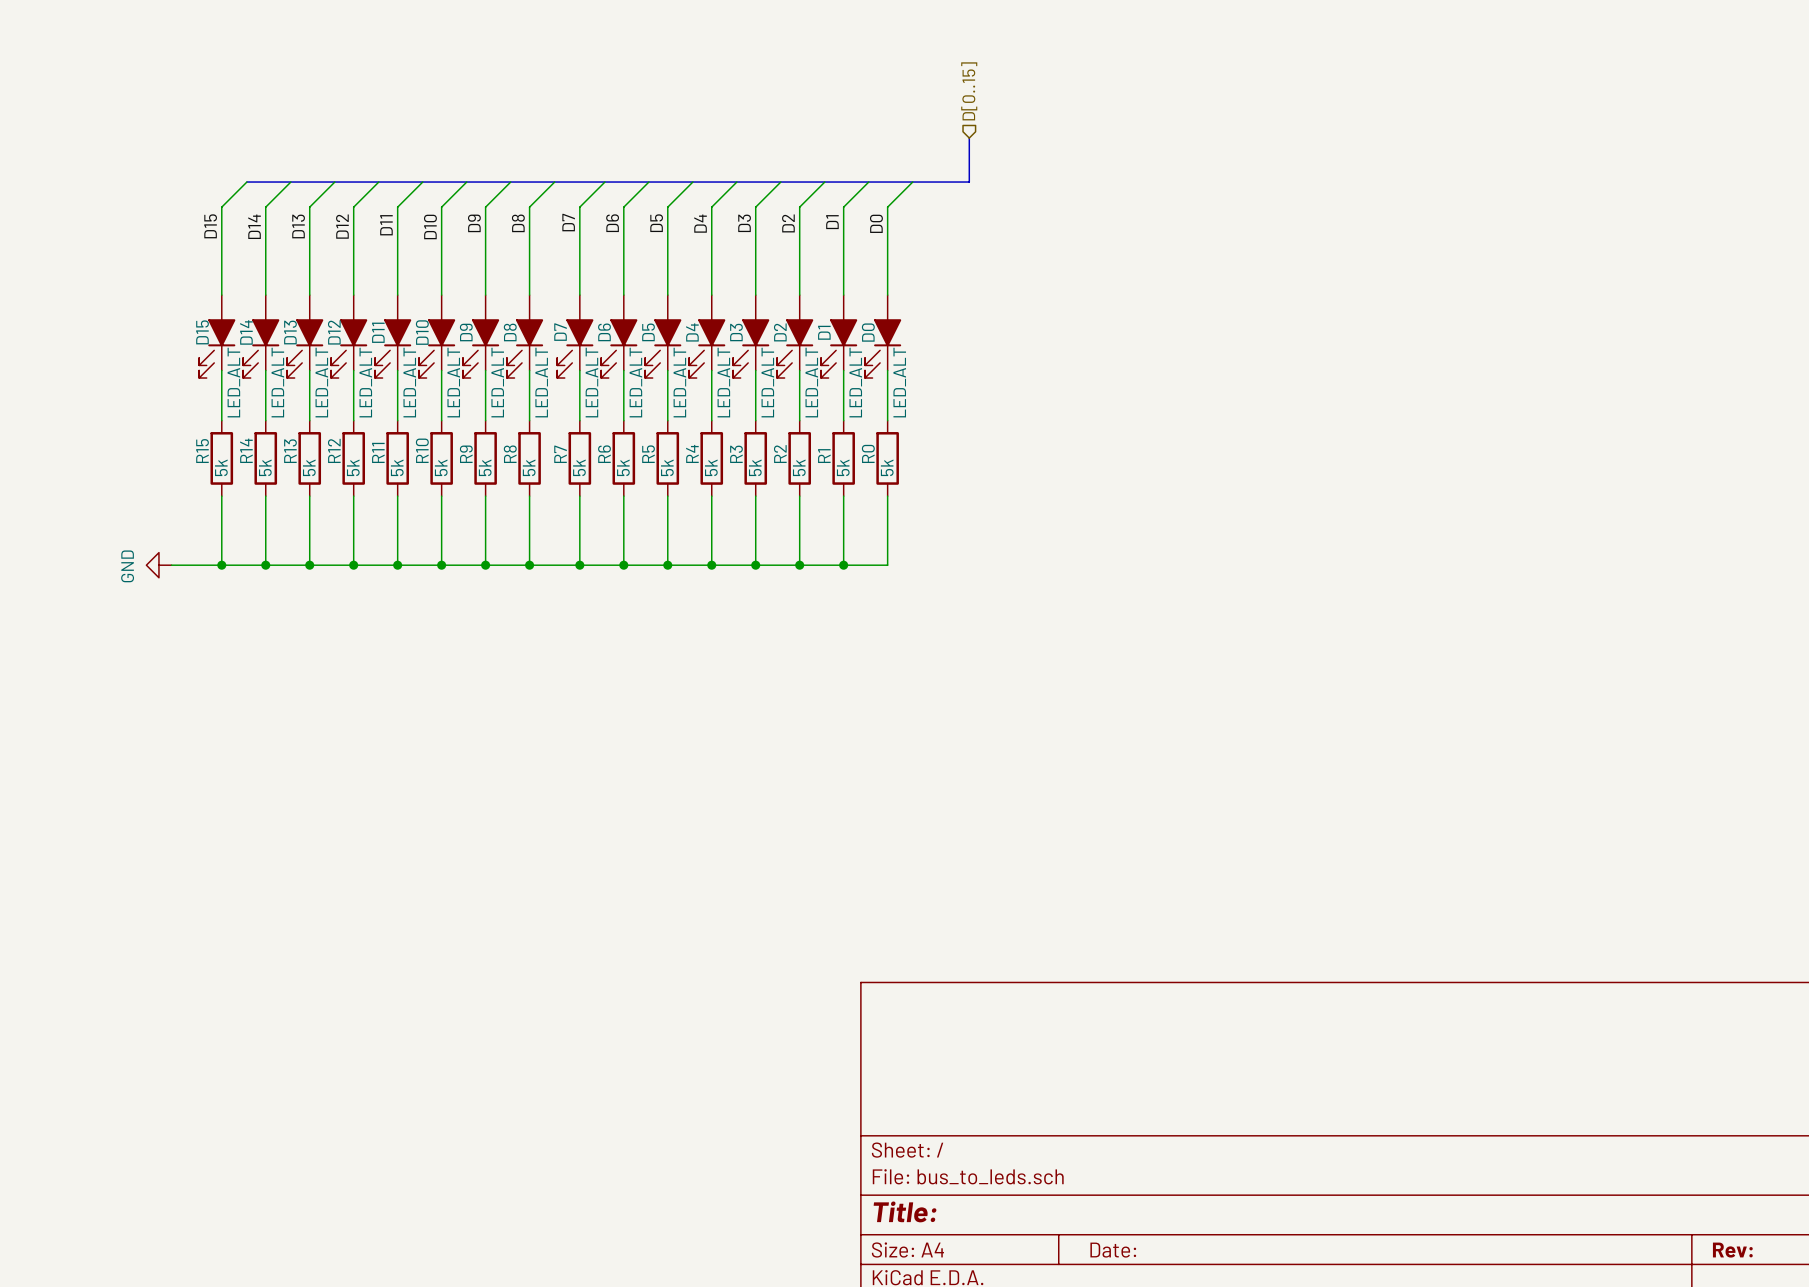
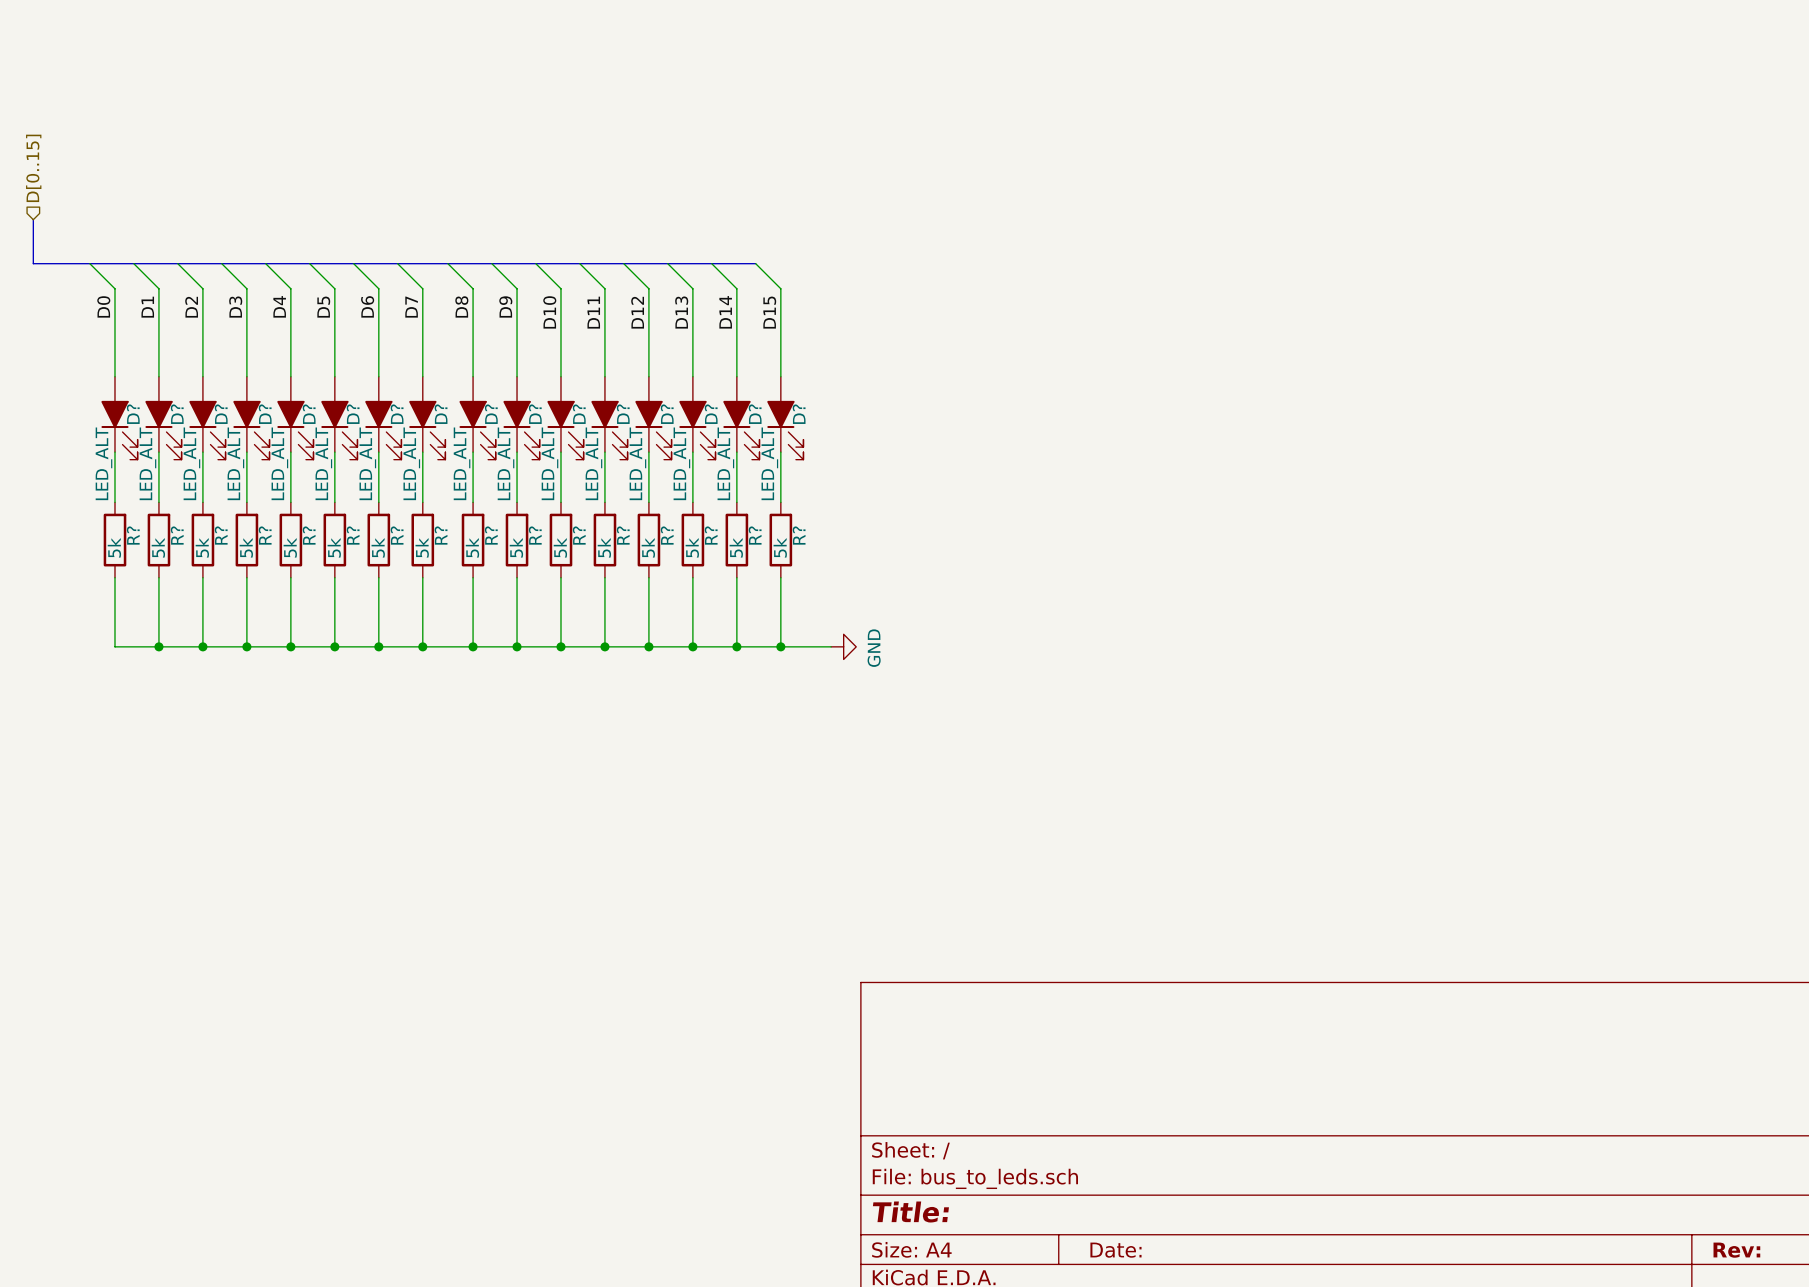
hierarchical label: D[0..15] (969, 91) -> none
bus: (969, 138) (969, 182) (246, 182) -> none
hierarchical label: none -> D[0..15] (33, 168)
wire: (246, 182) (221, 207) (221, 295) -> none
wire: (290, 182) (265, 207) (265, 295) -> none
wire: (334, 182) (309, 207) (309, 295) -> none
wire: (378, 182) (353, 207) (353, 295) -> none
wire: (422, 182) (397, 207) (397, 295) -> none
wire: (466, 182) (441, 207) (441, 295) -> none
wire: (510, 182) (485, 207) (485, 295) -> none
wire: (554, 182) (529, 207) (529, 295) -> none
wire: (604, 182) (579, 207) (579, 295) -> none
wire: (648, 182) (623, 207) (623, 295) -> none
wire: (692, 182) (667, 207) (667, 295) -> none
wire: (736, 182) (711, 207) (711, 295) -> none
wire: (780, 182) (755, 207) (755, 295) -> none
wire: (824, 182) (799, 207) (799, 295) -> none
wire: (868, 182) (843, 207) (843, 295) -> none
wire: (912, 182) (887, 207) (887, 295) -> none
bus: none -> (33, 219) (33, 263) (755, 263)
label position: D7 (568, 222) -> D7 (411, 307)
label: D1 (832, 222) -> none
label position: D9 (474, 223) -> D9 (505, 306)
label position: D8 (518, 223) -> D8 (461, 306)
label: D6 (612, 223) -> none
label: D5 (656, 223) -> none
label: D4 (700, 223) -> none
label: D3 (744, 223) -> none
label: D2 (788, 223) -> none
label: D0 (876, 223) -> none
label position: D11 (386, 225) -> D11 (593, 312)
label: D15 (210, 226) -> none
label: D14 (254, 226) -> none
label: D13 (298, 226) -> none
label: D12 (342, 226) -> none
label position: D10 (430, 226) -> D10 (549, 312)
wire: none -> (89, 263) (114, 288) (114, 376)
wire: none -> (133, 263) (158, 288) (158, 376)
wire: none -> (177, 263) (202, 288) (202, 376)
wire: none -> (221, 263) (246, 288) (246, 376)
wire: none -> (265, 263) (290, 288) (290, 376)
wire: none -> (309, 263) (334, 288) (334, 376)
wire: none -> (353, 263) (378, 288) (378, 376)
wire: none -> (397, 263) (422, 288) (422, 376)
wire: none -> (447, 263) (473, 288) (473, 376)
wire: none -> (491, 263) (517, 288) (517, 376)
wire: none -> (535, 263) (560, 288) (560, 376)
wire: none -> (579, 263) (604, 288) (604, 376)
wire: none -> (623, 263) (648, 288) (648, 376)
wire: none -> (667, 263) (692, 288) (692, 376)
wire: none -> (711, 263) (736, 288) (736, 376)
wire: none -> (755, 263) (780, 288) (780, 376)
label: none -> D1 (147, 307)
label: none -> D3 (235, 307)
label: none -> D5 (323, 307)
label: none -> D6 (367, 306)
label: none -> D0 (103, 306)
label: none -> D2 (191, 307)
label: none -> D4 (279, 306)
label: none -> D15 (769, 312)
label: none -> D12 (637, 312)
label: none -> D13 (681, 312)
label: none -> D14 (725, 312)
D15: LED_ALT (217, 336) -> none
D14: LED_ALT (261, 336) -> none
D13: LED_ALT (305, 336) -> none
D12: LED_ALT (349, 336) -> none
D11: LED_ALT (393, 336) -> none
D10: LED_ALT (437, 336) -> none
D9: LED_ALT (481, 336) -> none
D8: LED_ALT (525, 336) -> none
D7: LED_ALT (575, 336) -> none
D6: LED_ALT (619, 336) -> none
D5: LED_ALT (663, 336) -> none
D4: LED_ALT (707, 336) -> none
D3: LED_ALT (751, 336) -> none
D2: LED_ALT (795, 336) -> none
D1: LED_ALT (839, 336) -> none
D0: LED_ALT (883, 336) -> none
wire: (221, 370) (221, 420) -> (114, 452) (114, 502)
wire: (265, 370) (265, 420) -> (158, 452) (158, 502)
wire: (309, 370) (309, 420) -> (202, 452) (202, 502)
wire: (353, 370) (353, 420) -> (246, 452) (246, 502)
wire: (397, 370) (397, 420) -> (290, 452) (290, 502)
wire: (441, 370) (441, 420) -> (334, 452) (334, 502)
wire: (485, 370) (485, 420) -> (378, 452) (378, 502)
wire: (529, 370) (529, 420) -> (422, 452) (422, 502)
wire: (579, 370) (579, 420) -> (473, 452) (473, 502)
wire: (623, 370) (623, 420) -> (517, 452) (517, 502)
wire: (667, 370) (667, 420) -> (560, 452) (560, 502)
wire: (711, 370) (711, 420) -> (604, 452) (604, 502)
wire: (755, 370) (755, 420) -> (648, 452) (648, 502)
wire: (799, 370) (799, 420) -> (692, 452) (692, 502)
wire: (843, 370) (843, 420) -> (736, 452) (736, 502)
wire: (887, 370) (887, 420) -> (780, 452) (780, 502)
D?: none -> LED_ALT (119, 418)
D?: none -> LED_ALT (163, 418)
D?: none -> LED_ALT (207, 418)
D?: none -> LED_ALT (251, 418)
D?: none -> LED_ALT (295, 418)
D?: none -> LED_ALT (339, 418)
D?: none -> LED_ALT (383, 418)
D?: none -> LED_ALT (427, 418)
D?: none -> LED_ALT (477, 418)
D?: none -> LED_ALT (521, 418)
D?: none -> LED_ALT (565, 418)
D?: none -> LED_ALT (609, 418)
D?: none -> LED_ALT (653, 418)
D?: none -> LED_ALT (697, 418)
D?: none -> LED_ALT (741, 418)
D?: none -> LED_ALT (785, 418)
R15: 5k (221, 458) -> none
R14: 5k (265, 458) -> none
R13: 5k (309, 458) -> none
R12: 5k (353, 458) -> none
R11: 5k (397, 458) -> none
R10: 5k (441, 458) -> none
R9: 5k (485, 458) -> none
R8: 5k (529, 458) -> none
R7: 5k (579, 458) -> none
R6: 5k (623, 458) -> none
R5: 5k (667, 458) -> none
R4: 5k (711, 458) -> none
R3: 5k (755, 458) -> none
R2: 5k (799, 458) -> none
R1: 5k (843, 458) -> none
R0: 5k (887, 458) -> none
wire: (221, 496) (221, 565) -> none
wire: (265, 496) (265, 565) -> (158, 577) (158, 646)
wire: (309, 496) (309, 565) -> (202, 577) (202, 646)
wire: (353, 496) (353, 565) -> (246, 577) (246, 646)
wire: (397, 496) (397, 565) -> (290, 577) (290, 646)
wire: (441, 496) (441, 565) -> (334, 577) (334, 646)
wire: (485, 496) (485, 565) -> (378, 577) (378, 646)
wire: (529, 496) (529, 565) -> (422, 577) (422, 646)
wire: (579, 496) (579, 565) -> (473, 577) (473, 646)
wire: (623, 496) (623, 565) -> (517, 577) (517, 646)
wire: (667, 496) (667, 565) -> (560, 577) (560, 646)
wire: (711, 496) (711, 565) -> (604, 577) (604, 646)
wire: (755, 496) (755, 565) -> (648, 577) (648, 646)
wire: (799, 496) (799, 565) -> (692, 577) (692, 646)
wire: (843, 496) (843, 565) -> (736, 577) (736, 646)
wire: (887, 496) (887, 565) (171, 565) -> none
R?: none -> 5k (114, 540)
R?: none -> 5k (158, 540)
R?: none -> 5k (202, 540)
R?: none -> 5k (246, 540)
R?: none -> 5k (290, 540)
R?: none -> 5k (334, 540)
R?: none -> 5k (378, 540)
R?: none -> 5k (422, 540)
R?: none -> 5k (473, 540)
R?: none -> 5k (517, 540)
R?: none -> 5k (560, 540)
R?: none -> 5k (604, 540)
R?: none -> 5k (648, 540)
R?: none -> 5k (692, 540)
R?: none -> 5k (736, 540)
R?: none -> 5k (780, 540)
power symbol: GND (158, 565) -> none
junction: (221, 565) -> none
junction: (265, 565) -> none
junction: (309, 565) -> none
junction: (353, 565) -> none
junction: (397, 565) -> none
junction: (441, 565) -> none
junction: (485, 565) -> none
junction: (529, 565) -> none
junction: (579, 565) -> none
junction: (623, 565) -> none
junction: (667, 565) -> none
junction: (711, 565) -> none
junction: (755, 565) -> none
junction: (799, 565) -> none
junction: (843, 565) -> none
wire: none -> (114, 577) (114, 646) (831, 646)
wire: none -> (780, 577) (780, 646)
junction: none -> (158, 646)
junction: none -> (202, 646)
junction: none -> (246, 646)
junction: none -> (290, 646)
junction: none -> (334, 646)
junction: none -> (378, 646)
junction: none -> (422, 646)
junction: none -> (473, 646)
junction: none -> (517, 646)
junction: none -> (560, 646)
junction: none -> (604, 646)
junction: none -> (648, 646)
junction: none -> (692, 646)
junction: none -> (736, 646)
junction: none -> (780, 646)
power symbol: none -> GND (843, 646)

